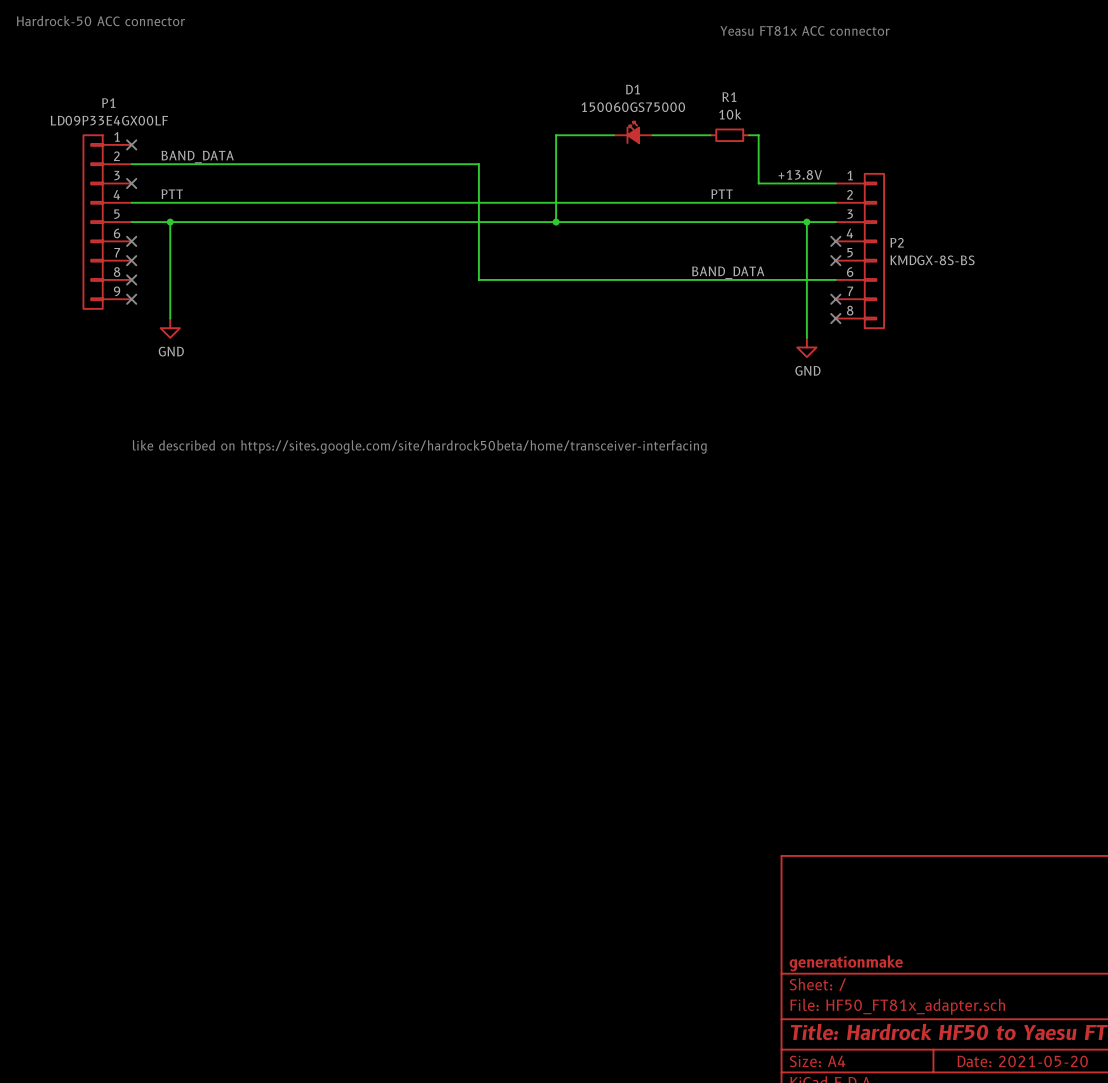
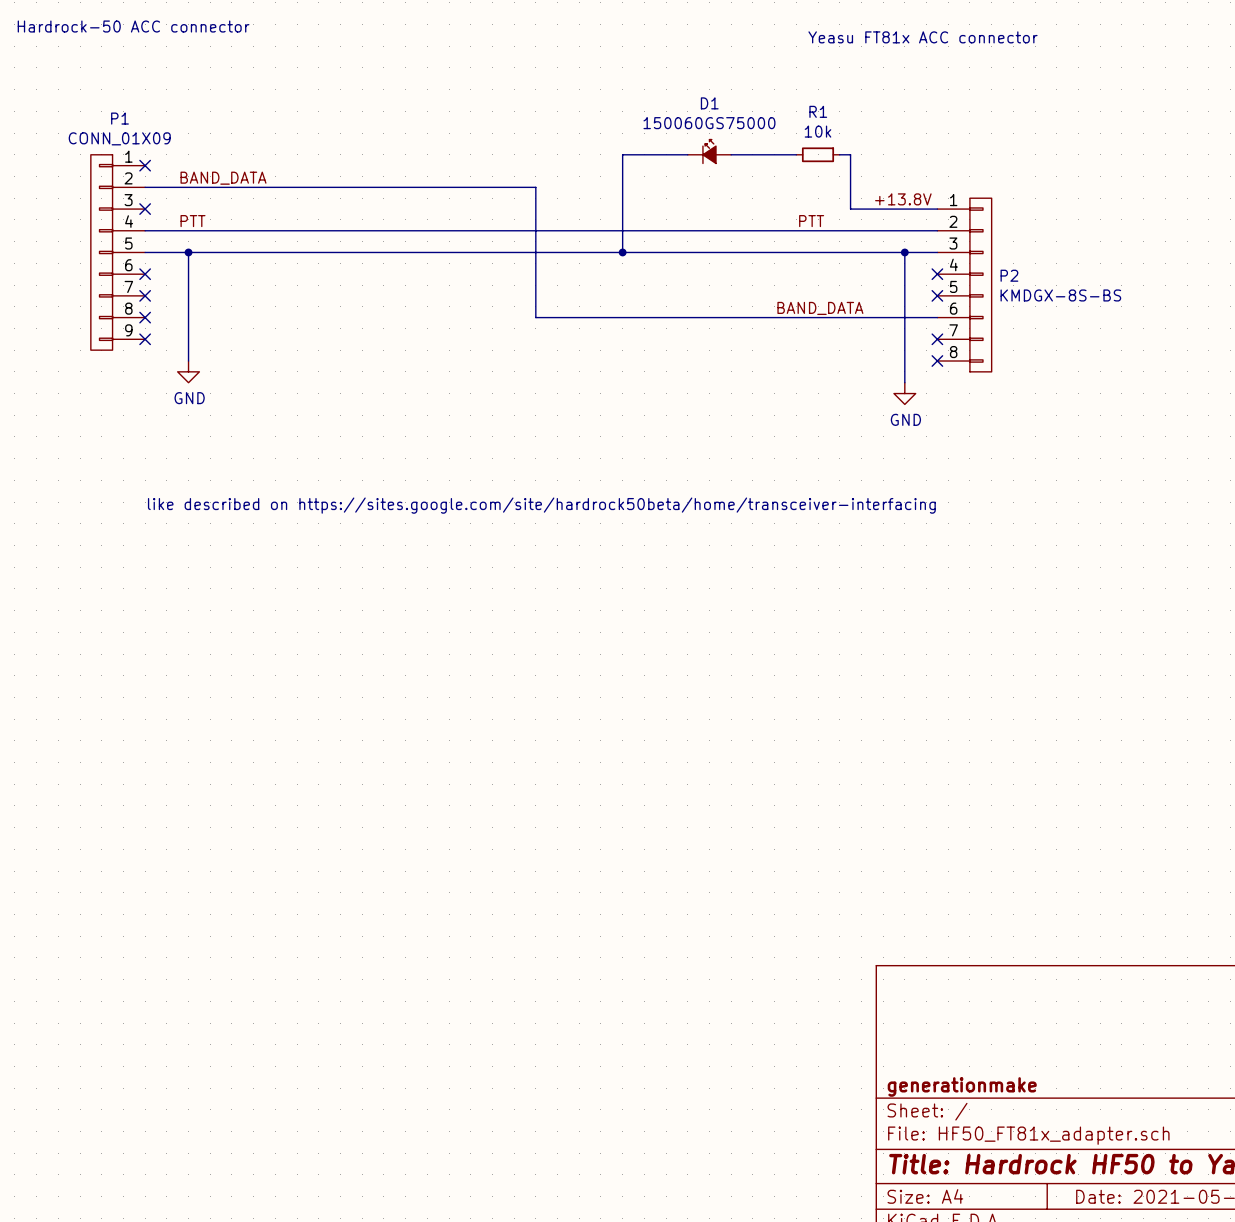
P1 value: LD09P33E4GX00LF (109, 120) -> CONN_01X09 (119, 138)

